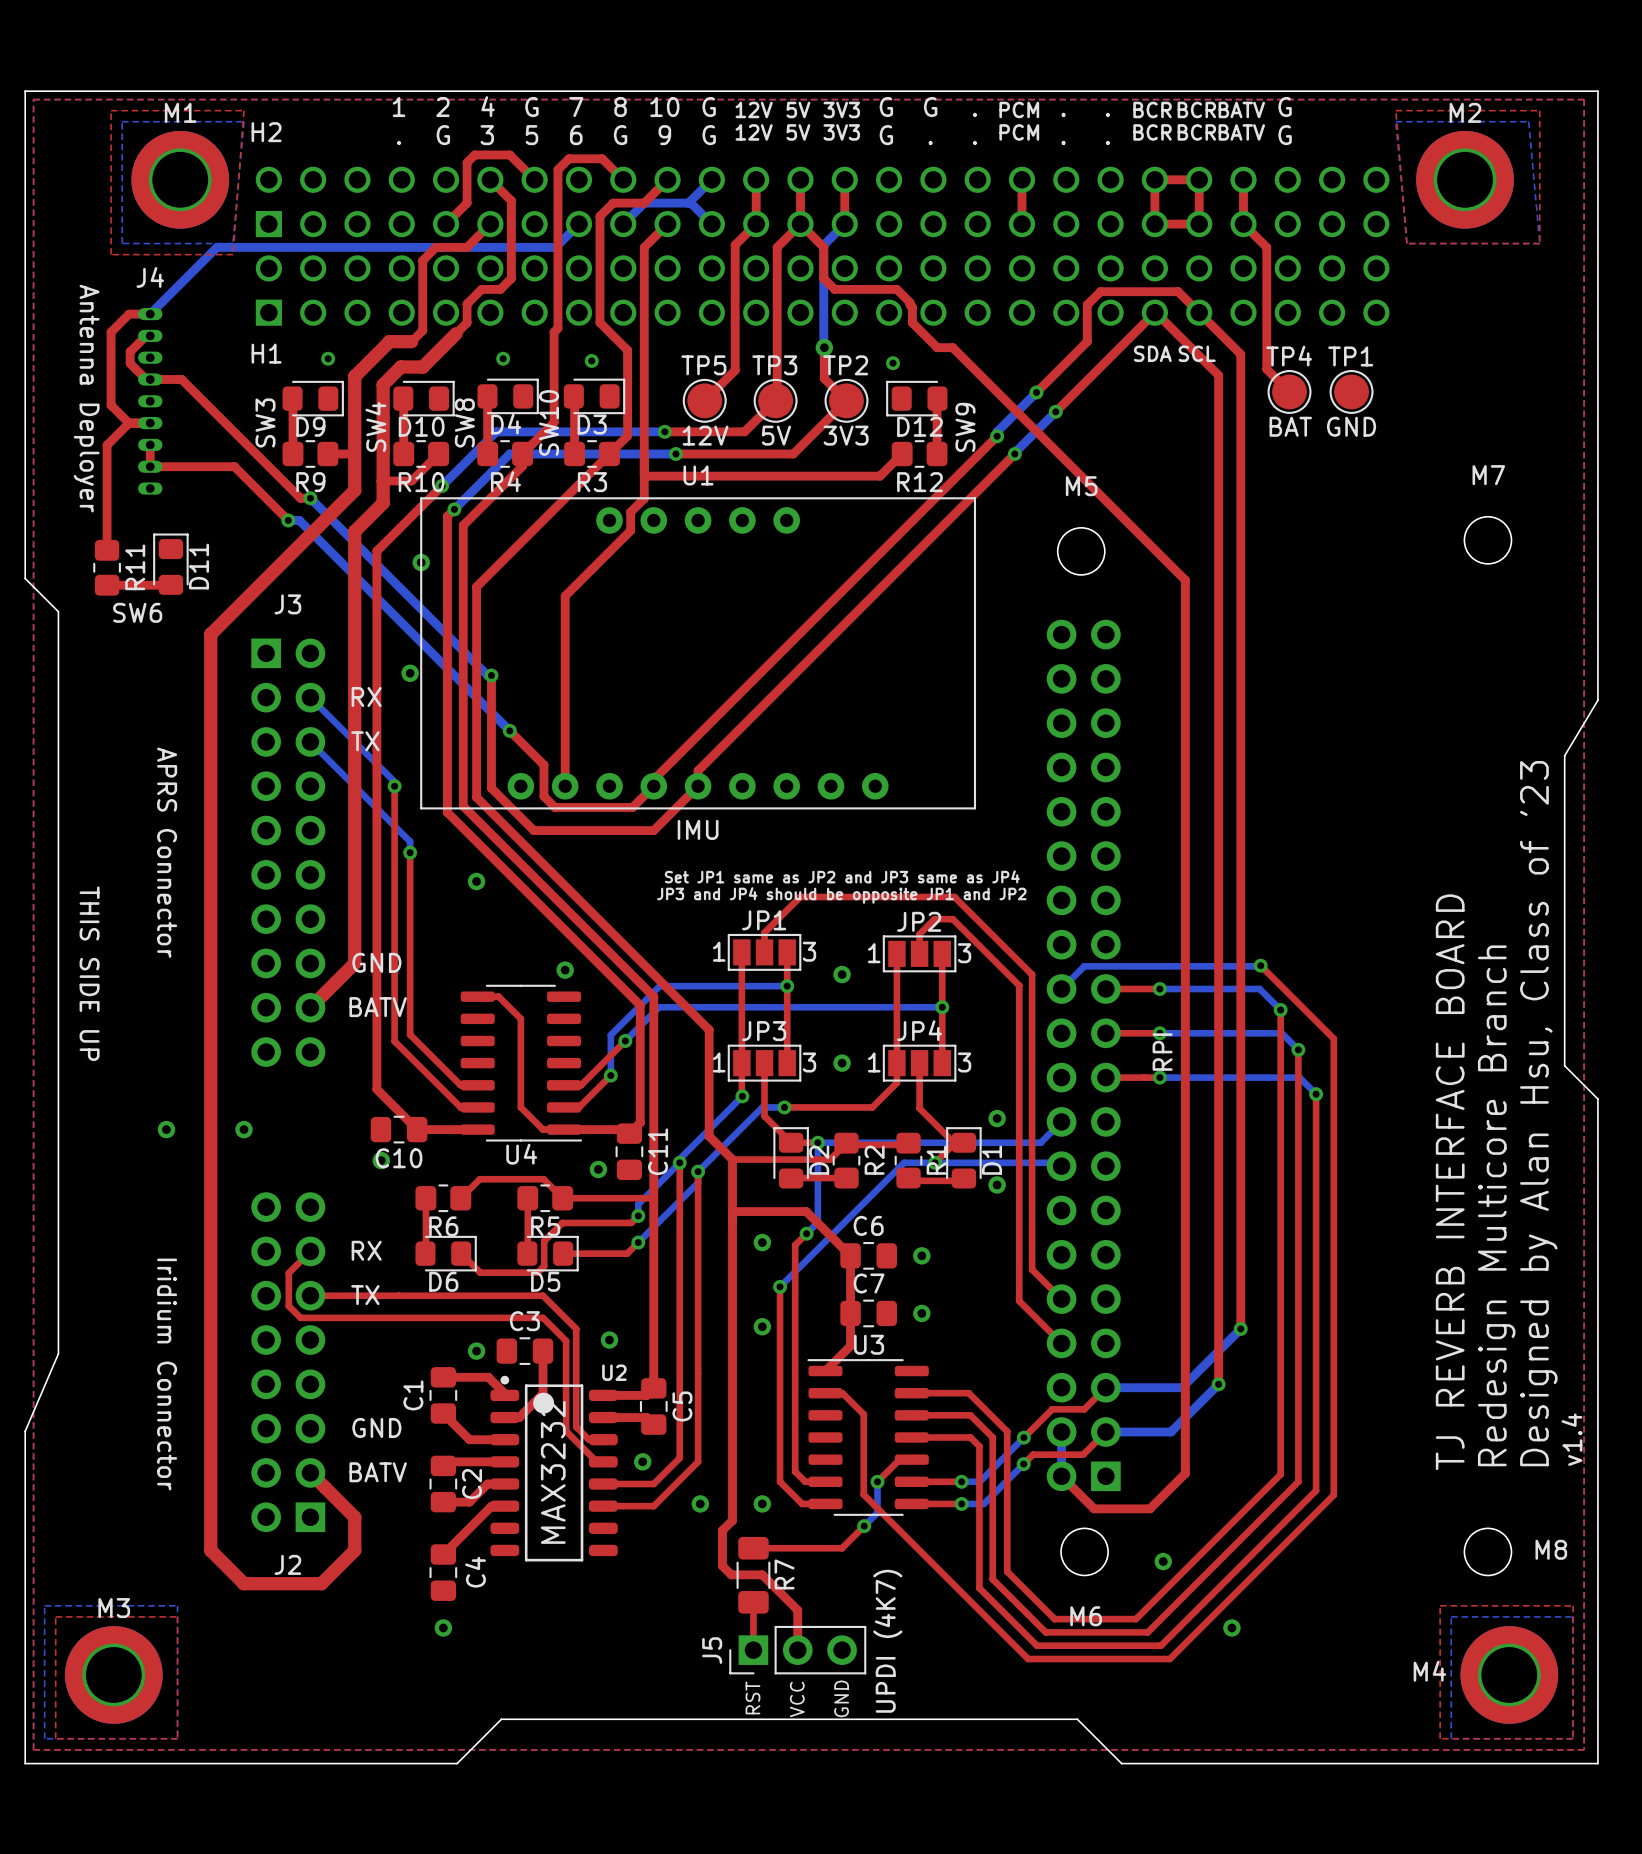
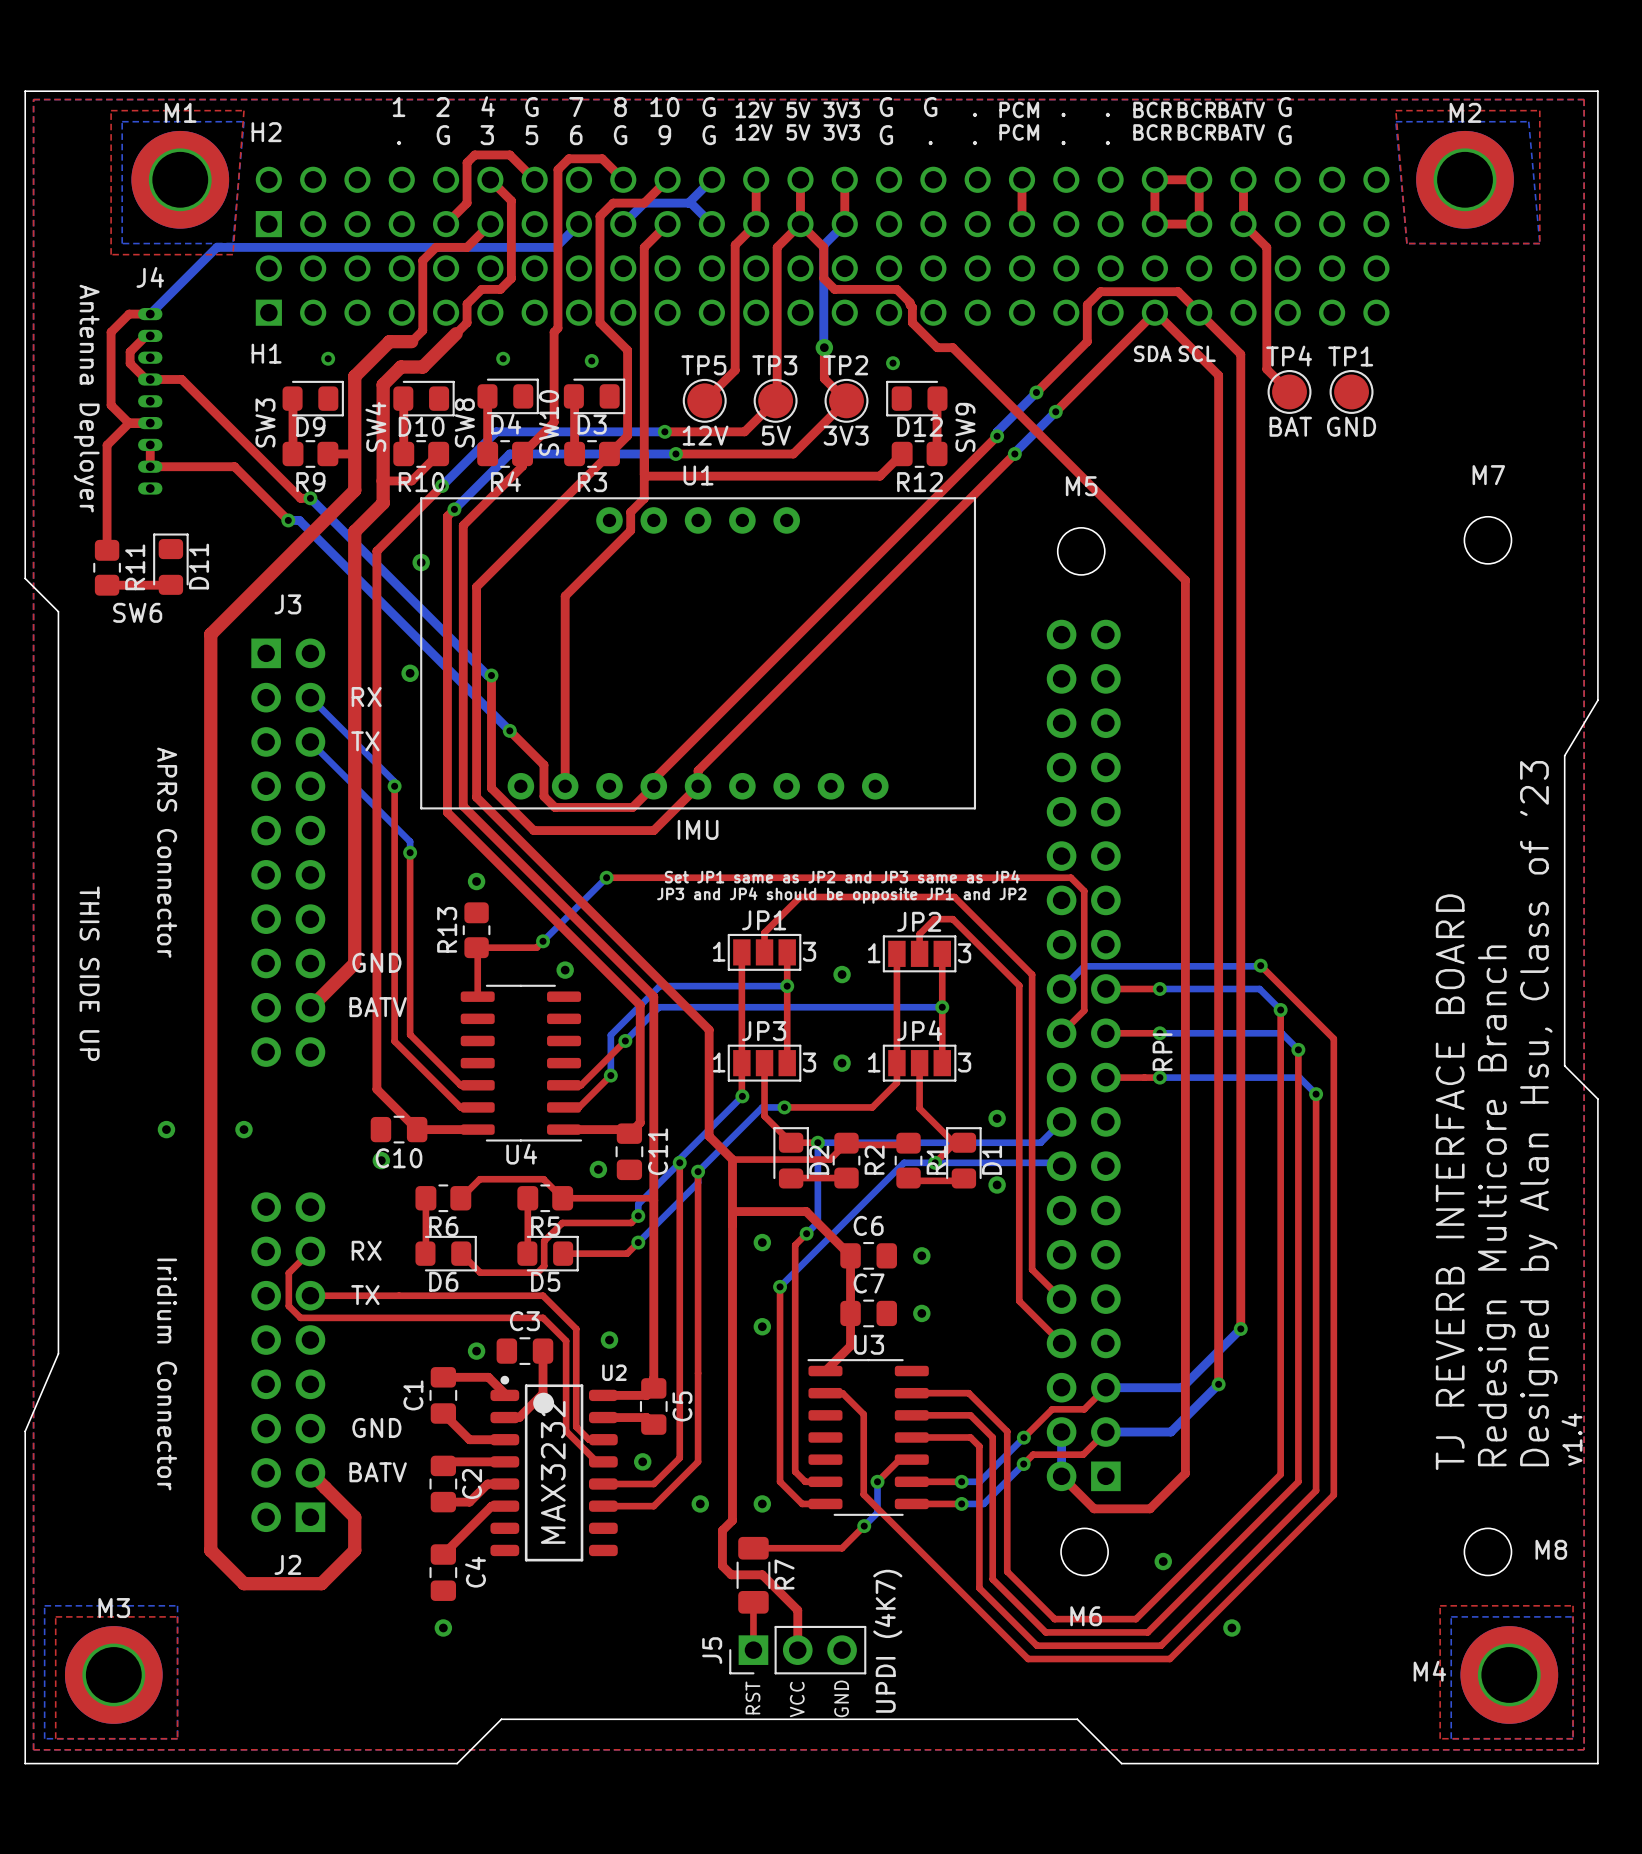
top track: none -> (606, 877) (1070, 877) (1084, 891) (1084, 1010) (1061, 1033)
bottom track: none -> (606, 877) (543, 941)
via: none -> (606, 877)
R13: none -> (476, 930)
via: none -> (543, 941)
top track: (477, 996) (498, 996) (520, 1018) (520, 1107) (543, 1129) (564, 1129) -> (477, 996) (476, 947) (536, 947) (543, 941)

